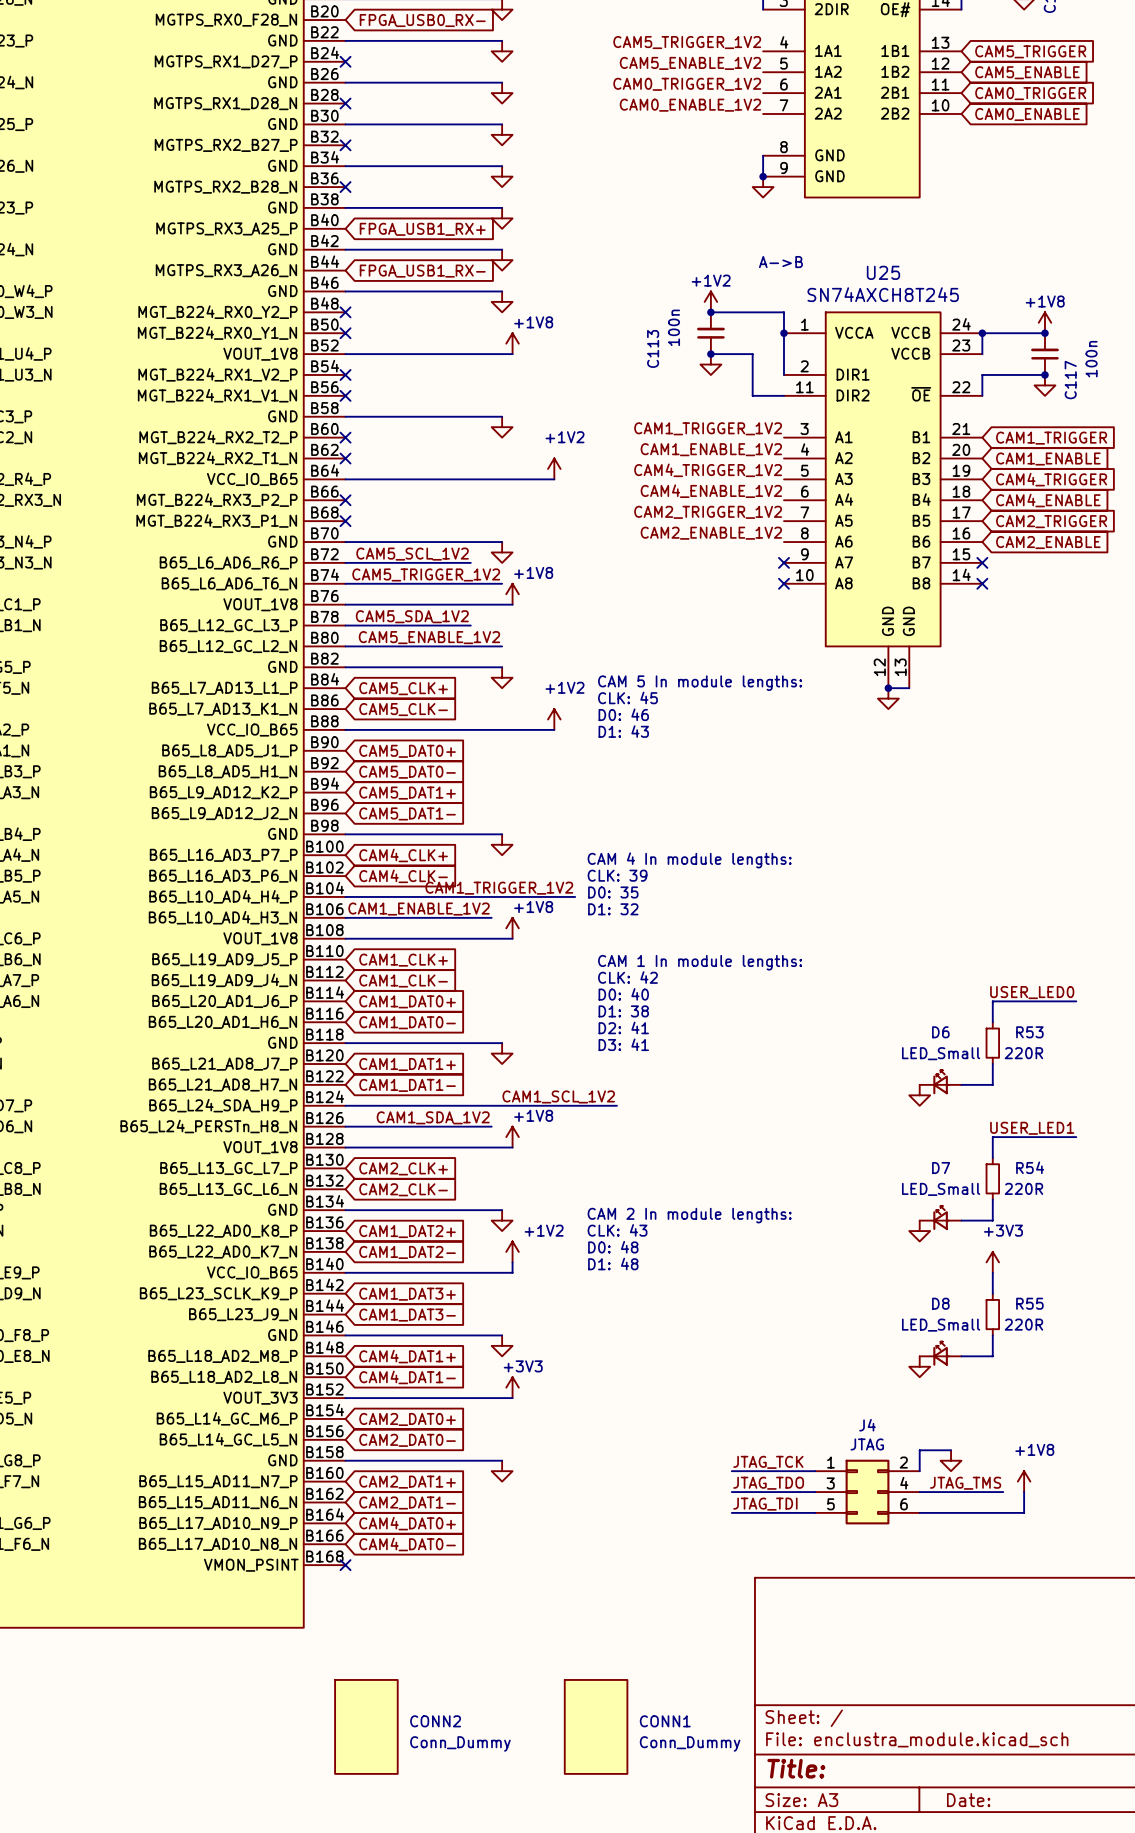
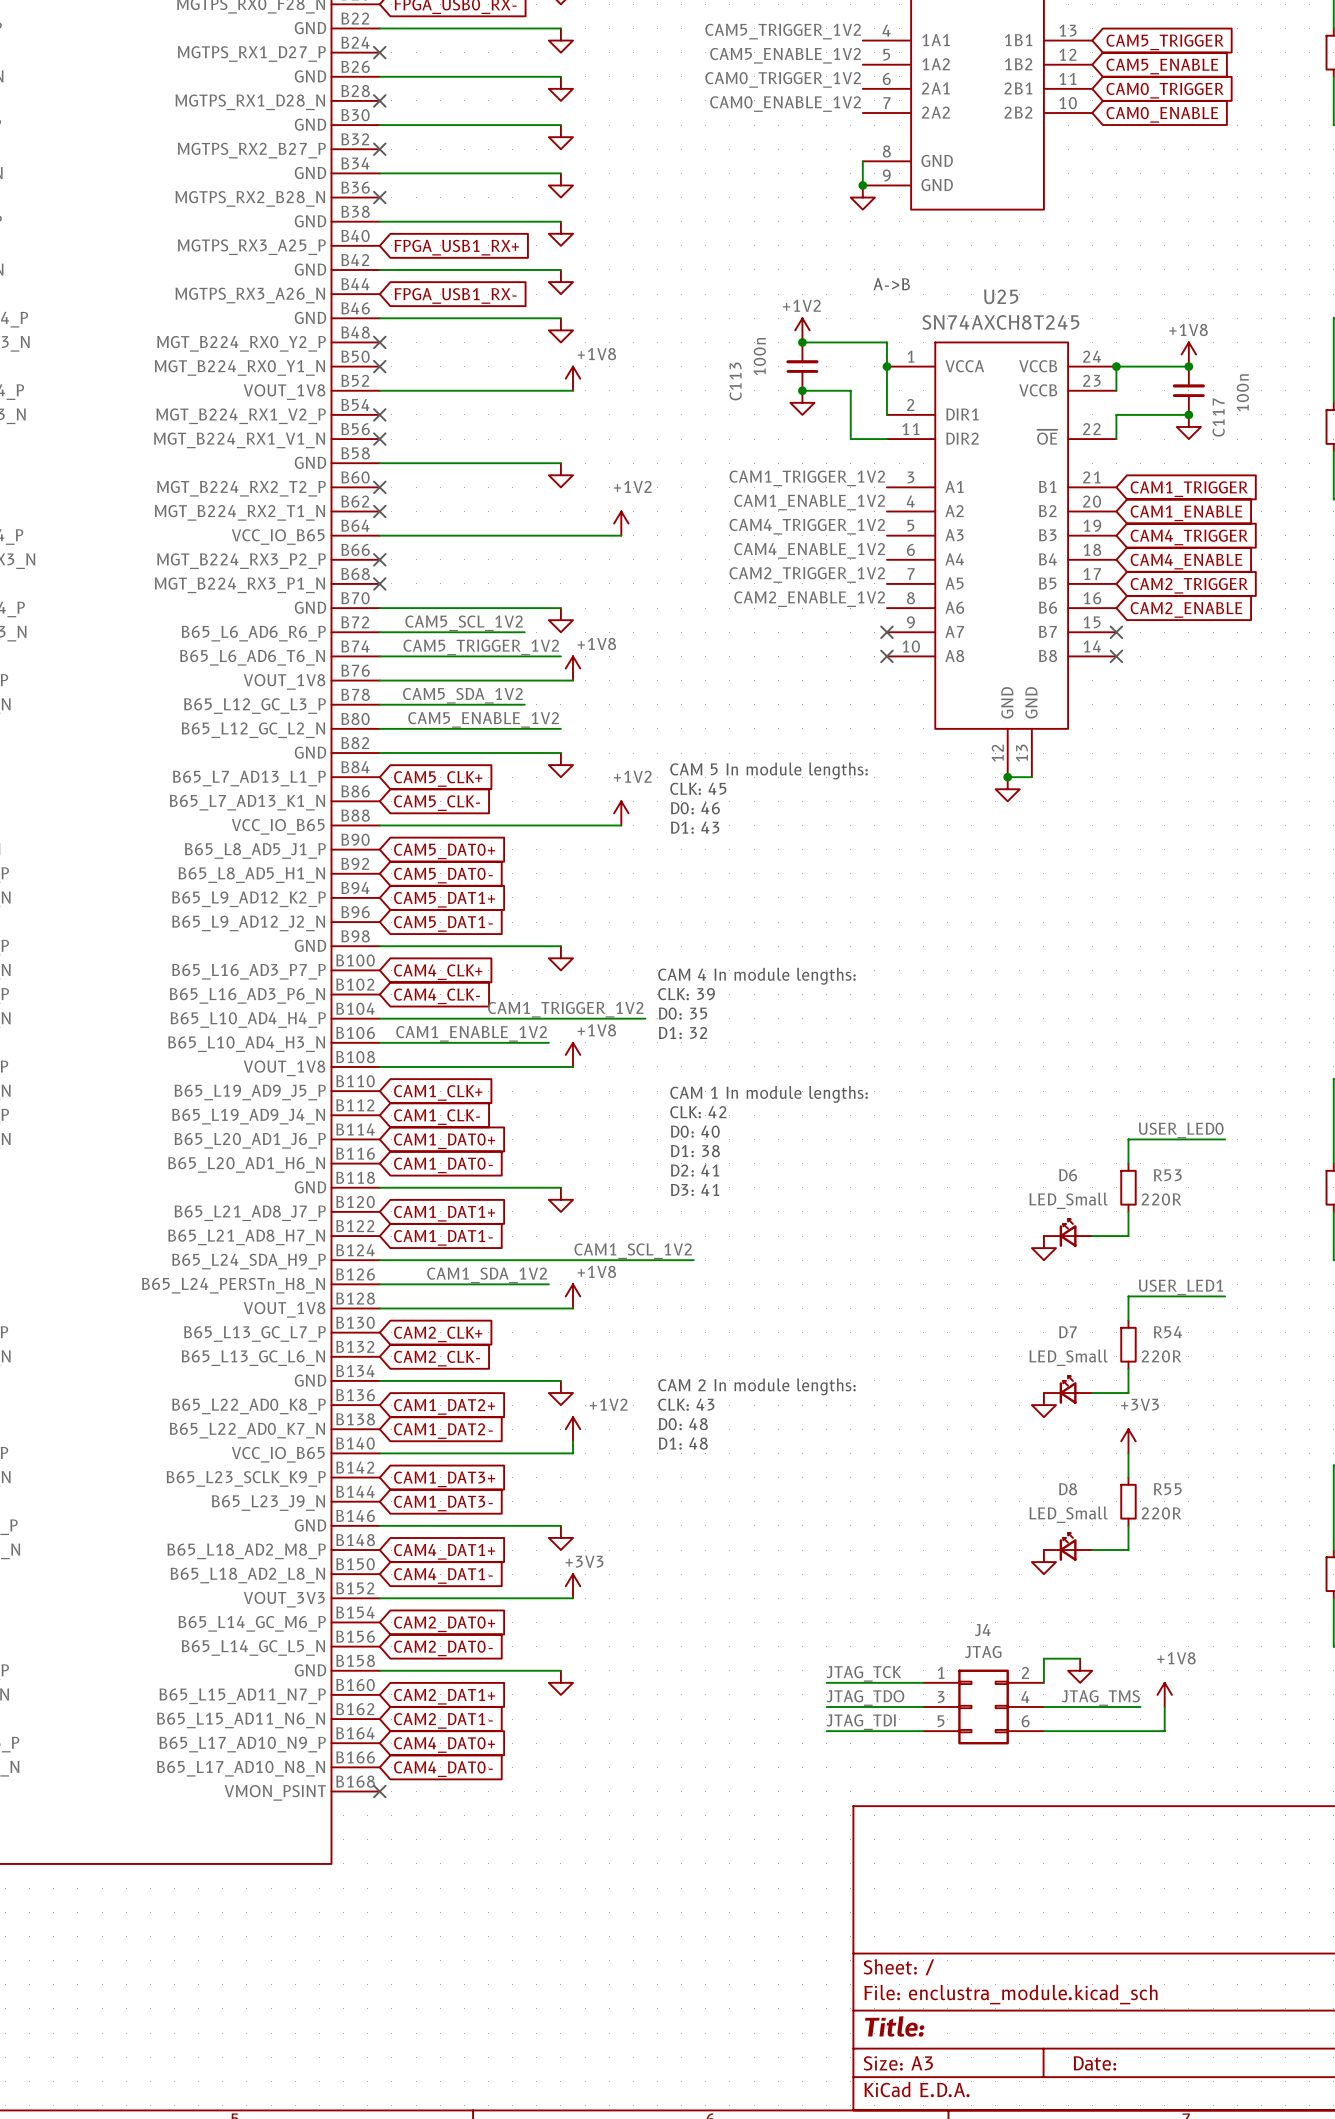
CONN2: Conn_Dummy (366, 1726) -> none
CONN1: Conn_Dummy (596, 1726) -> none

